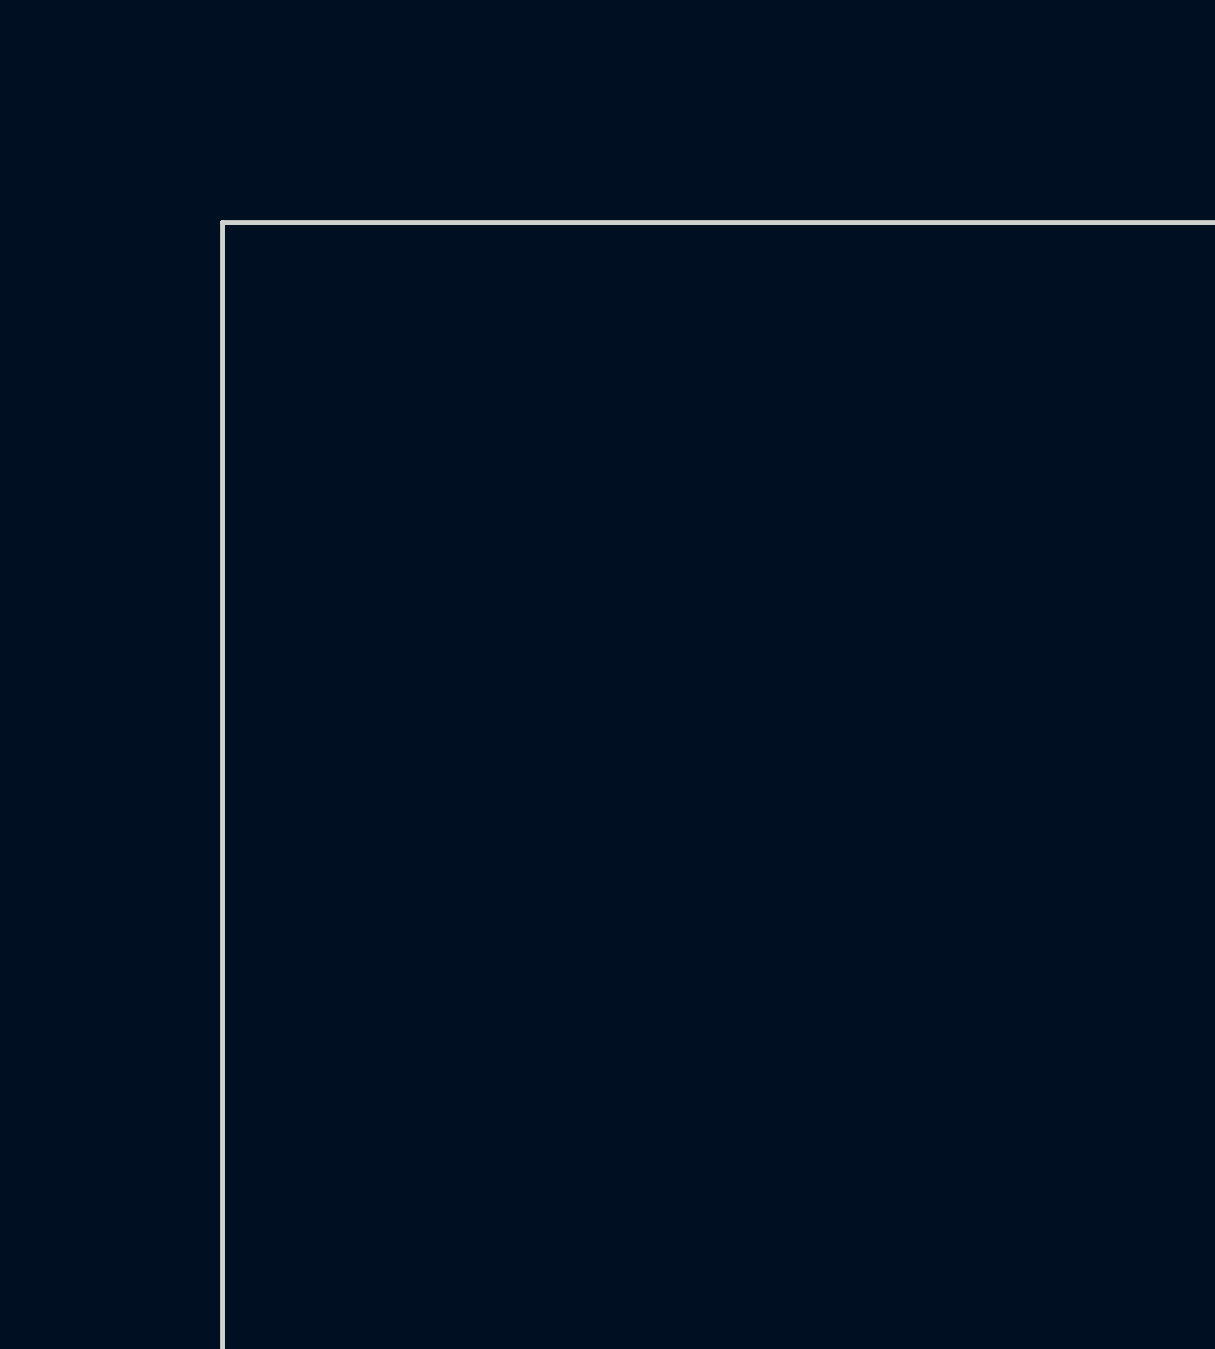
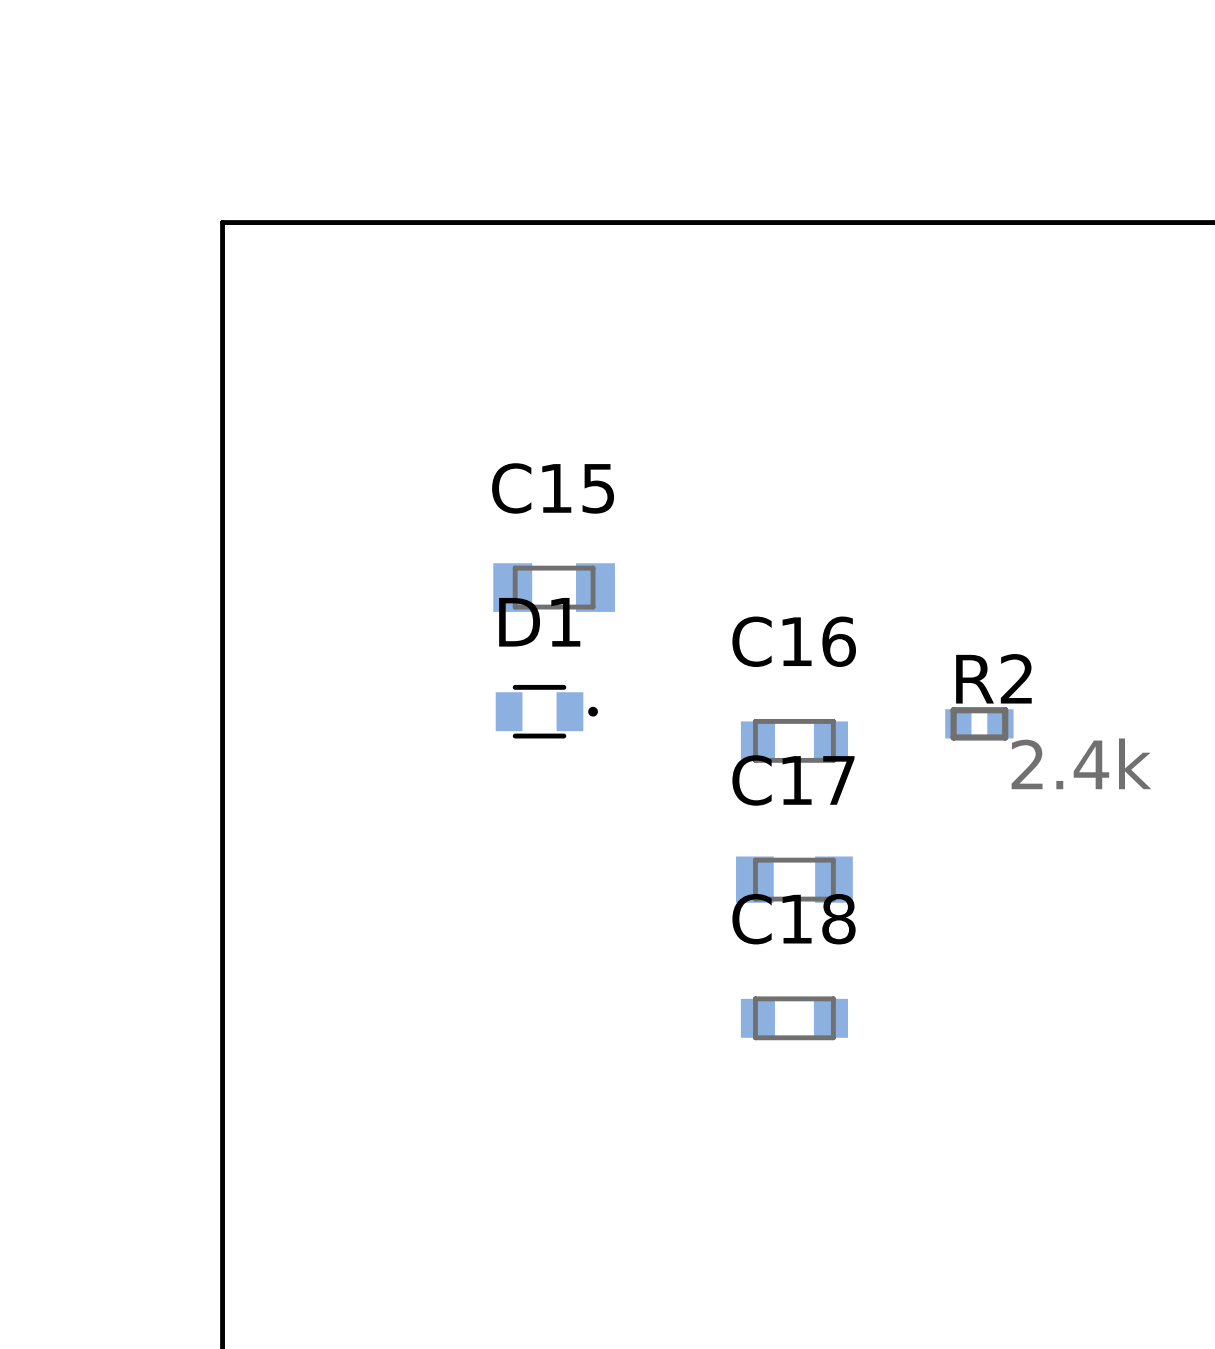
C15: none -> (554, 587)
D1: none -> (546, 711)
R2: none -> 2.4k (979, 723)
C16: none -> (794, 740)
C17: none -> (794, 879)
C18: none -> (794, 1018)

